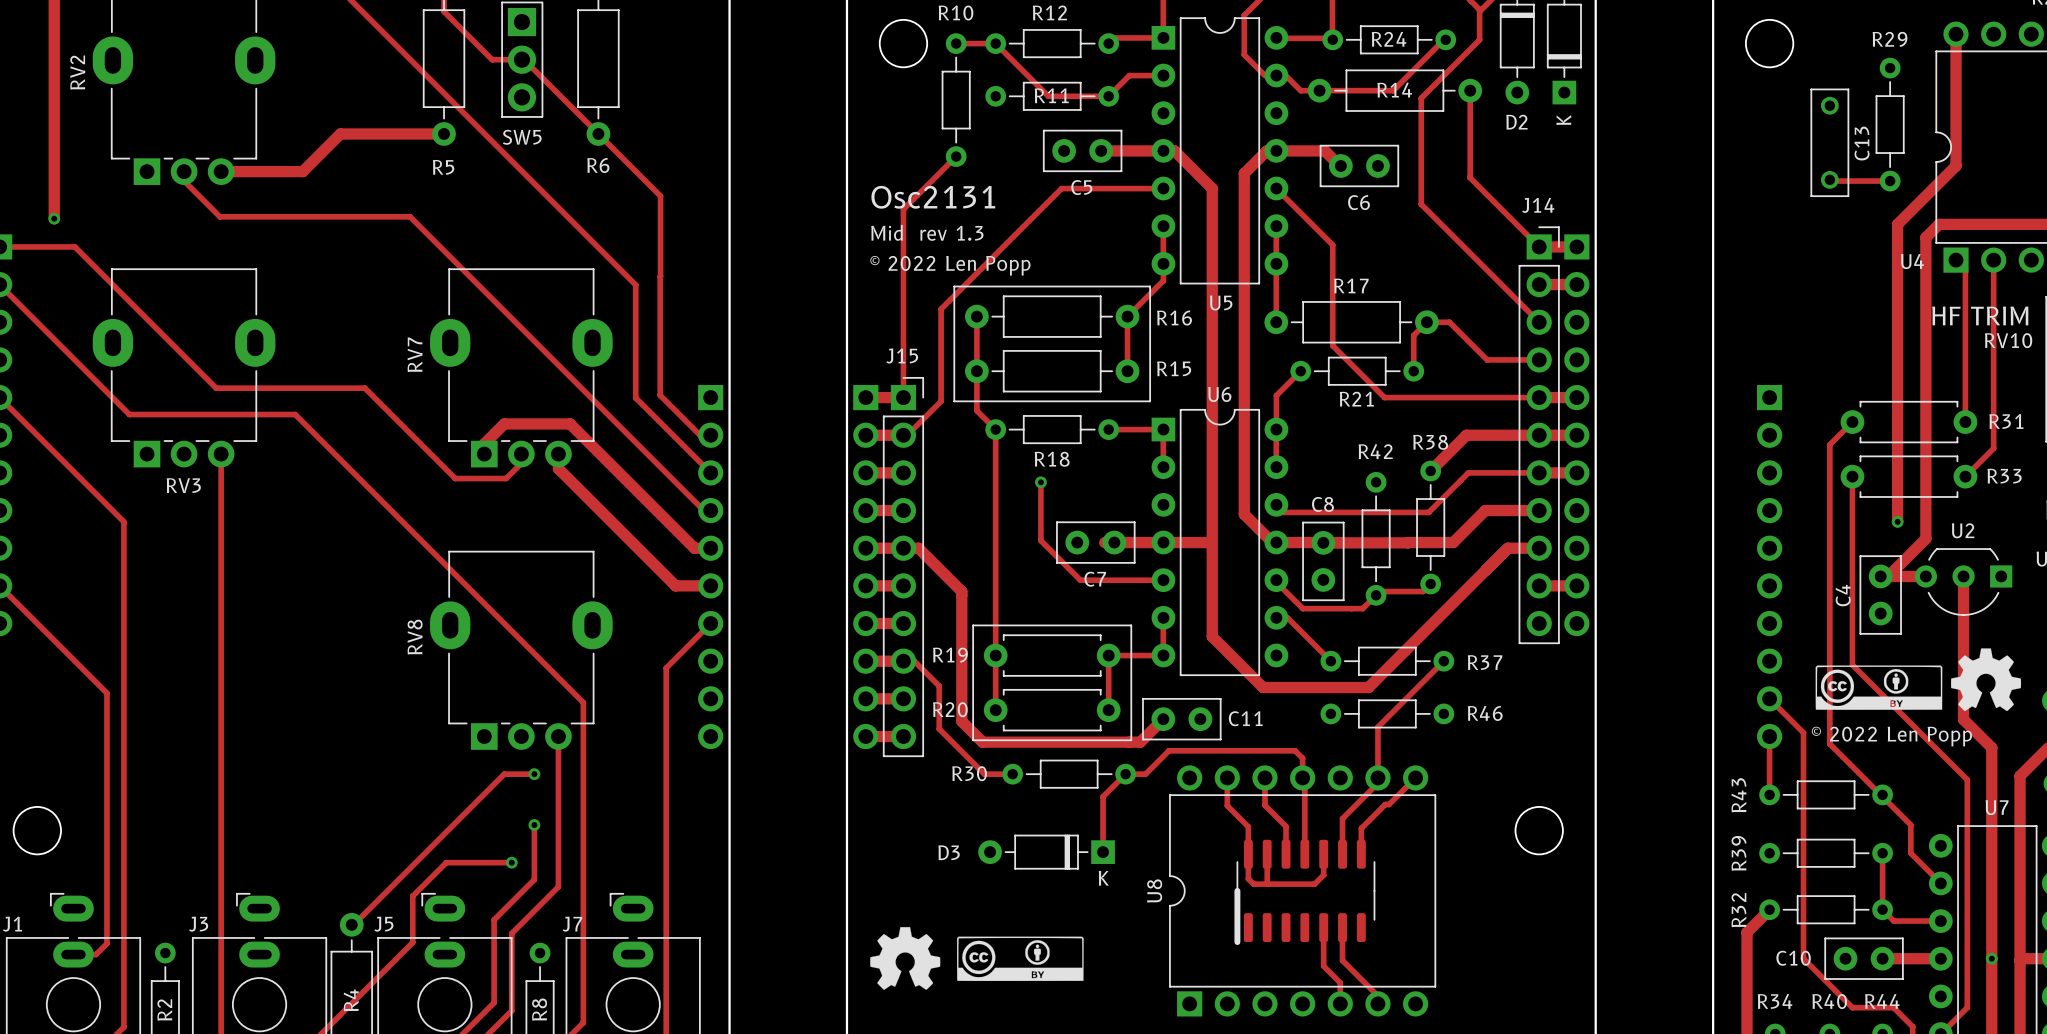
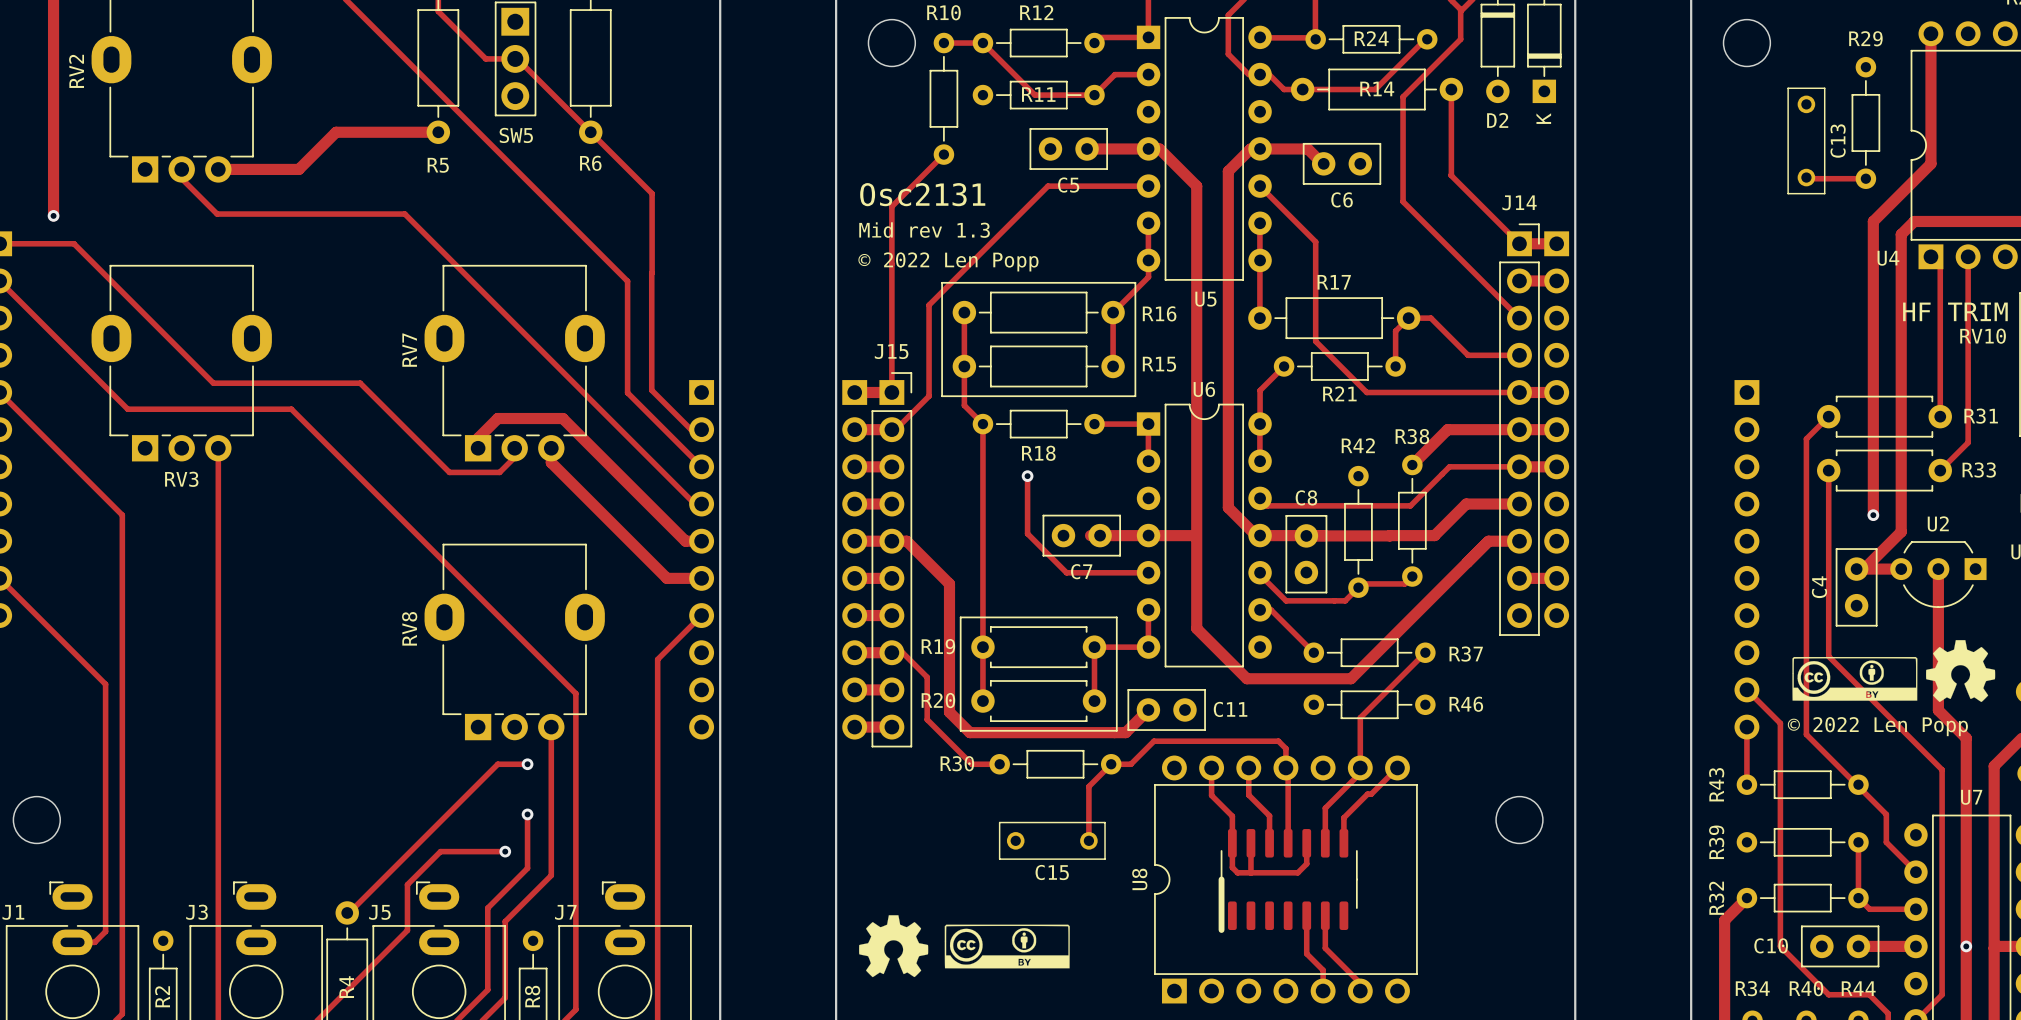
C15: none -> (1052, 840)
D3: (1046, 852) -> none

